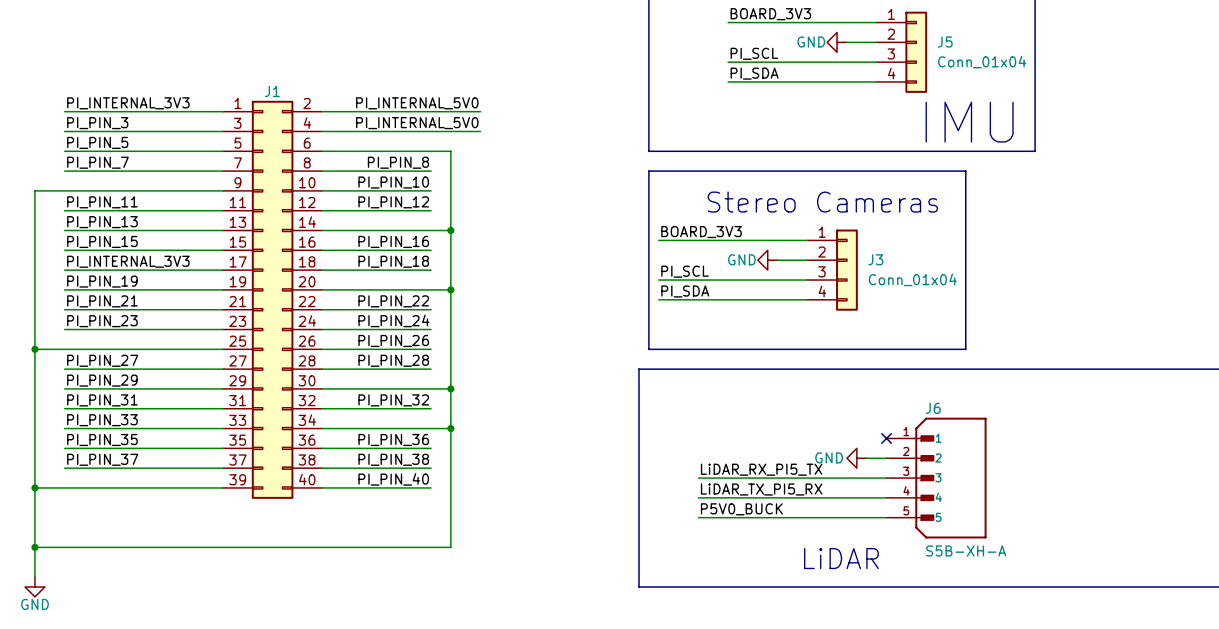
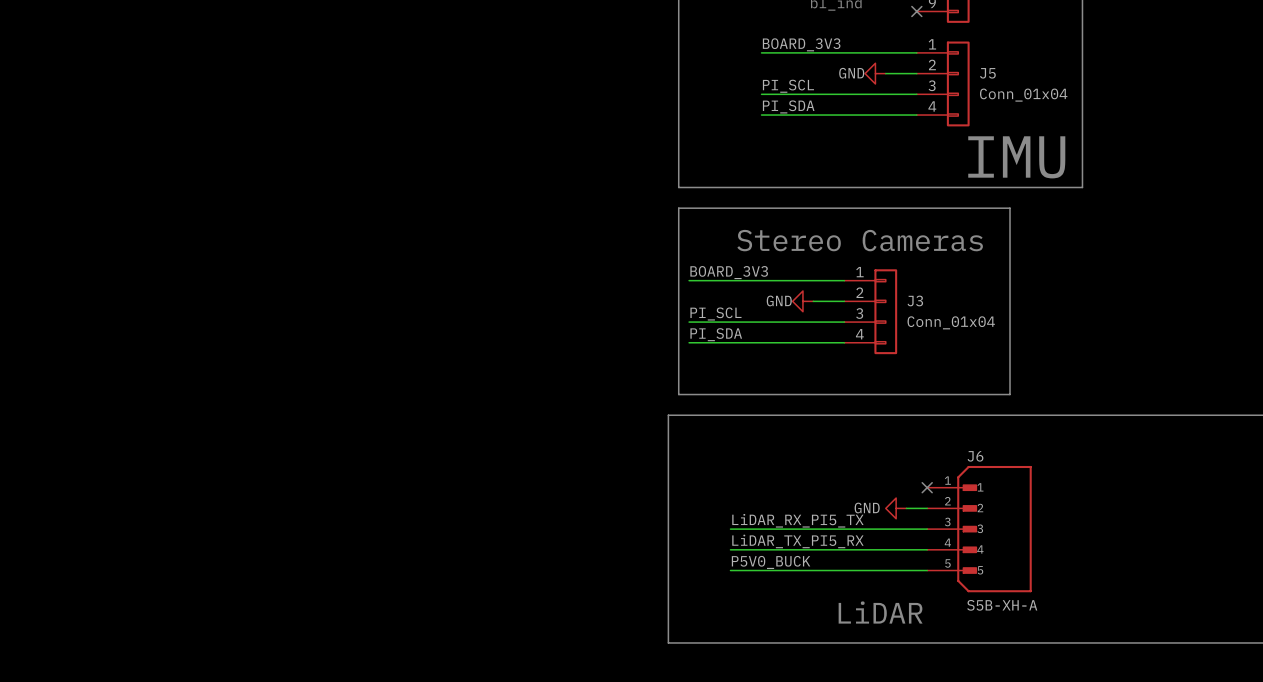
label: PI_INTERNAL_3V3 (128, 103) -> none
label: PI_INTERNAL_5V0 (417, 103) -> none
wire: (64, 111) (223, 111) -> none
wire: (322, 111) (480, 111) -> none
label: PI_PIN_3 (97, 123) -> none
label: PI_INTERNAL_5V0 (417, 123) -> none
wire: (64, 131) (223, 131) -> none
wire: (322, 131) (480, 131) -> none
label: PI_PIN_5 (97, 142) -> none
wire: (64, 151) (223, 151) -> none
wire: (322, 151) (450, 151) (450, 547) (34, 547) -> none
label: PI_PIN_7 (97, 162) -> none
label: PI_PIN_8 (398, 162) -> none
wire: (64, 171) (223, 171) -> none
wire: (322, 171) (431, 171) -> none
label: PI_PIN_10 (393, 182) -> none
wire: (223, 190) (34, 190) (34, 577) -> none
wire: (322, 190) (431, 190) -> none
label: PI_PIN_11 (102, 202) -> none
label: PI_PIN_12 (393, 202) -> none
wire: (64, 210) (223, 210) -> none
wire: (322, 210) (431, 210) -> none
label: PI_PIN_13 (102, 222) -> none
wire: (64, 230) (223, 230) -> none
wire: (322, 230) (450, 230) -> none
junction: (450, 230) -> none
label: PI_PIN_15 (102, 241) -> none
label: PI_PIN_16 (393, 241) -> none
wire: (64, 250) (223, 250) -> none
wire: (322, 250) (431, 250) -> none
label: PI_INTERNAL_3V3 (128, 261) -> none
label: PI_PIN_18 (393, 261) -> none
wire: (64, 270) (223, 270) -> none
wire: (322, 270) (431, 270) -> none
label: PI_PIN_19 (102, 281) -> none
wire: (64, 289) (223, 289) -> none
wire: (322, 289) (450, 289) -> none
junction: (450, 289) -> none
J1: (272, 299) -> none
label: PI_PIN_21 (102, 301) -> none
label: PI_PIN_22 (393, 301) -> none
wire: (64, 309) (223, 309) -> none
wire: (322, 309) (431, 309) -> none
label: PI_PIN_24 (393, 320) -> none
label: PI_PIN_23 (102, 321) -> none
wire: (64, 329) (223, 329) -> none
wire: (322, 329) (431, 329) -> none
label: PI_PIN_26 (393, 340) -> none
wire: (34, 349) (223, 349) -> none
junction: (34, 349) -> none
wire: (322, 349) (431, 349) -> none
label: PI_PIN_27 (102, 360) -> none
label: PI_PIN_28 (393, 360) -> none
wire: (64, 369) (223, 369) -> none
wire: (322, 369) (431, 369) -> none
label: PI_PIN_29 (102, 380) -> none
wire: (64, 388) (223, 388) -> none
wire: (322, 388) (450, 388) -> none
junction: (450, 388) -> none
label: PI_PIN_31 (102, 400) -> none
label: PI_PIN_32 (393, 400) -> none
wire: (64, 408) (223, 408) -> none
wire: (322, 408) (431, 408) -> none
label: PI_PIN_33 (102, 420) -> none
wire: (64, 428) (223, 428) -> none
wire: (322, 428) (450, 428) -> none
junction: (450, 428) -> none
label: PI_PIN_35 (102, 439) -> none
label: PI_PIN_36 (393, 439) -> none
wire: (64, 448) (223, 448) -> none
wire: (322, 448) (431, 448) -> none
label: PI_PIN_37 (102, 459) -> none
label: PI_PIN_38 (393, 459) -> none
wire: (64, 468) (223, 468) -> none
wire: (322, 468) (431, 468) -> none
label: PI_PIN_40 (393, 479) -> none
wire: (34, 487) (223, 487) -> none
junction: (34, 487) -> none
wire: (322, 487) (431, 487) -> none
junction: (34, 547) -> none
power symbol: GND (34, 586) -> none

